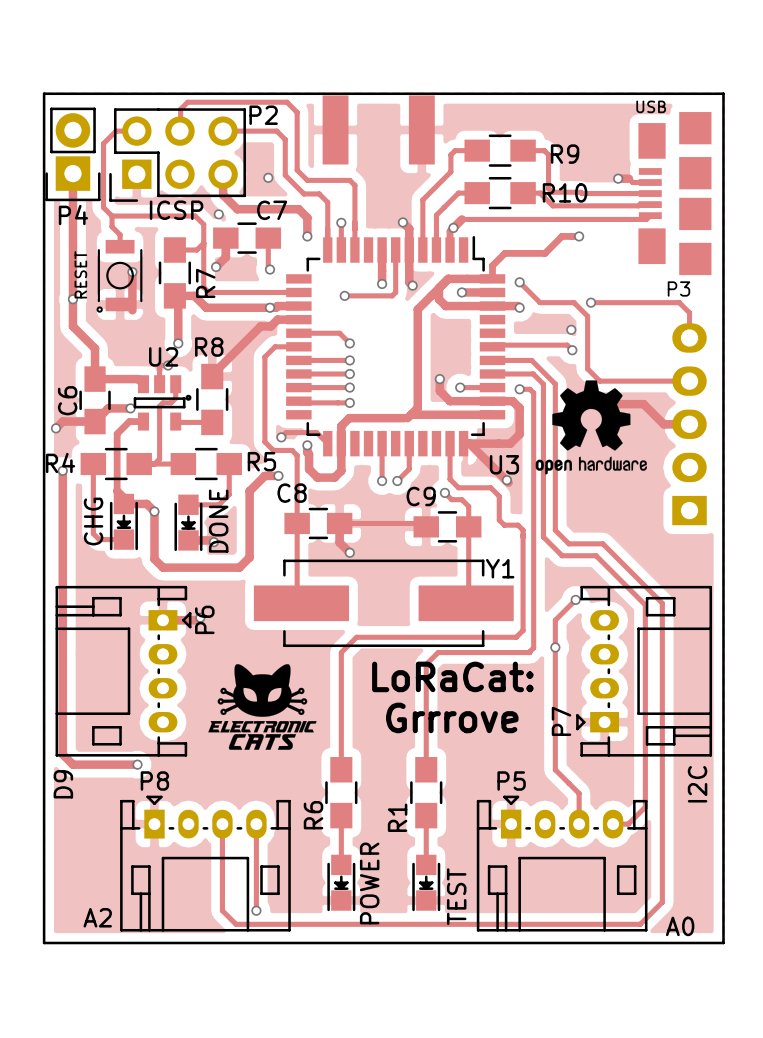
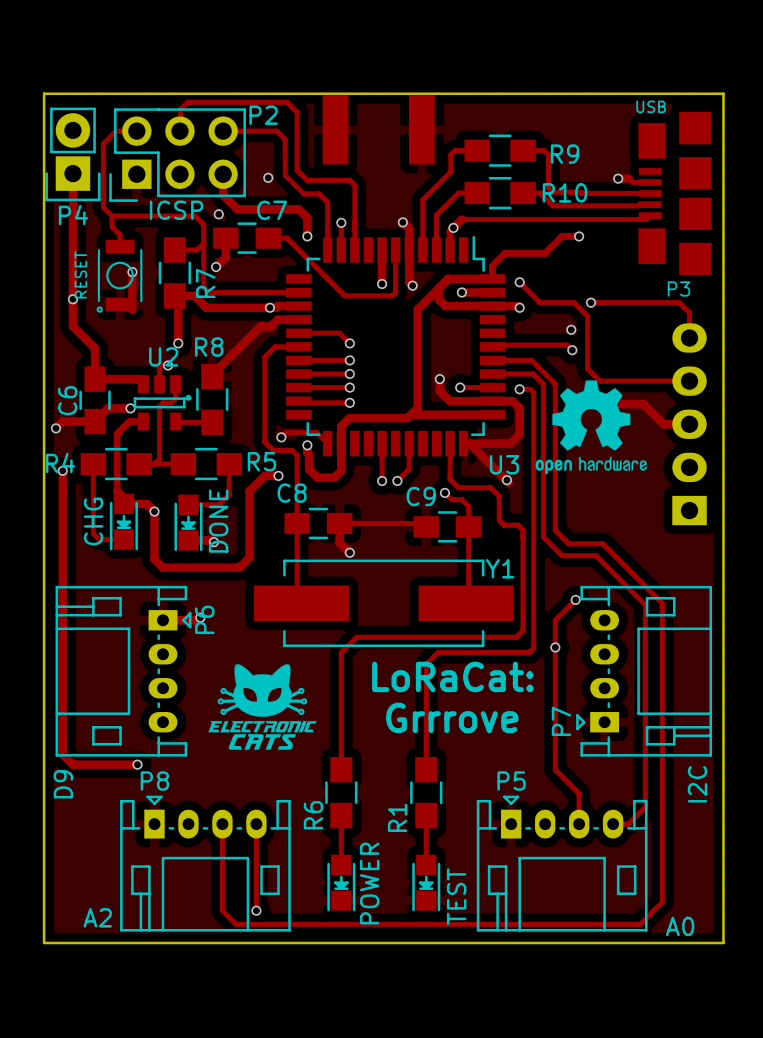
track: (268, 238) (268, 267) (269, 269) -> (268, 238) (286, 238) (344, 295)
via: (269, 269) -> none
via: (344, 295) -> none

